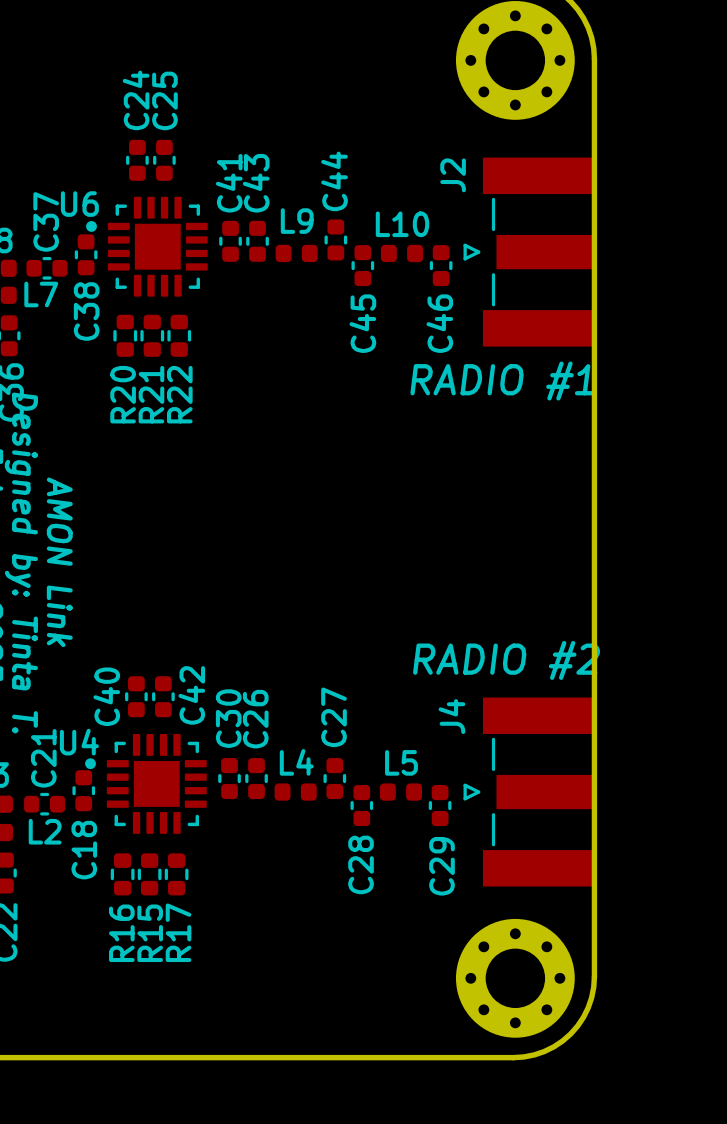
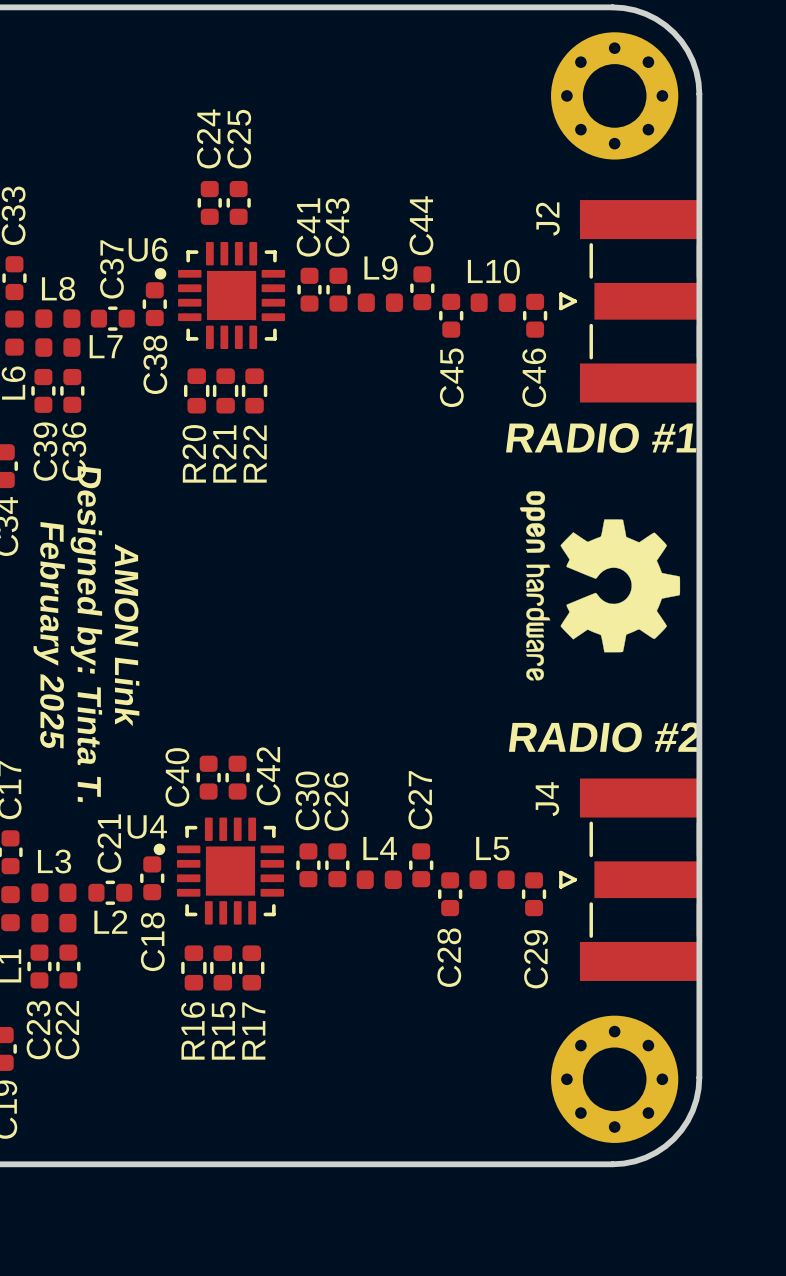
drawing: none -> [519, 491, 681, 681]

